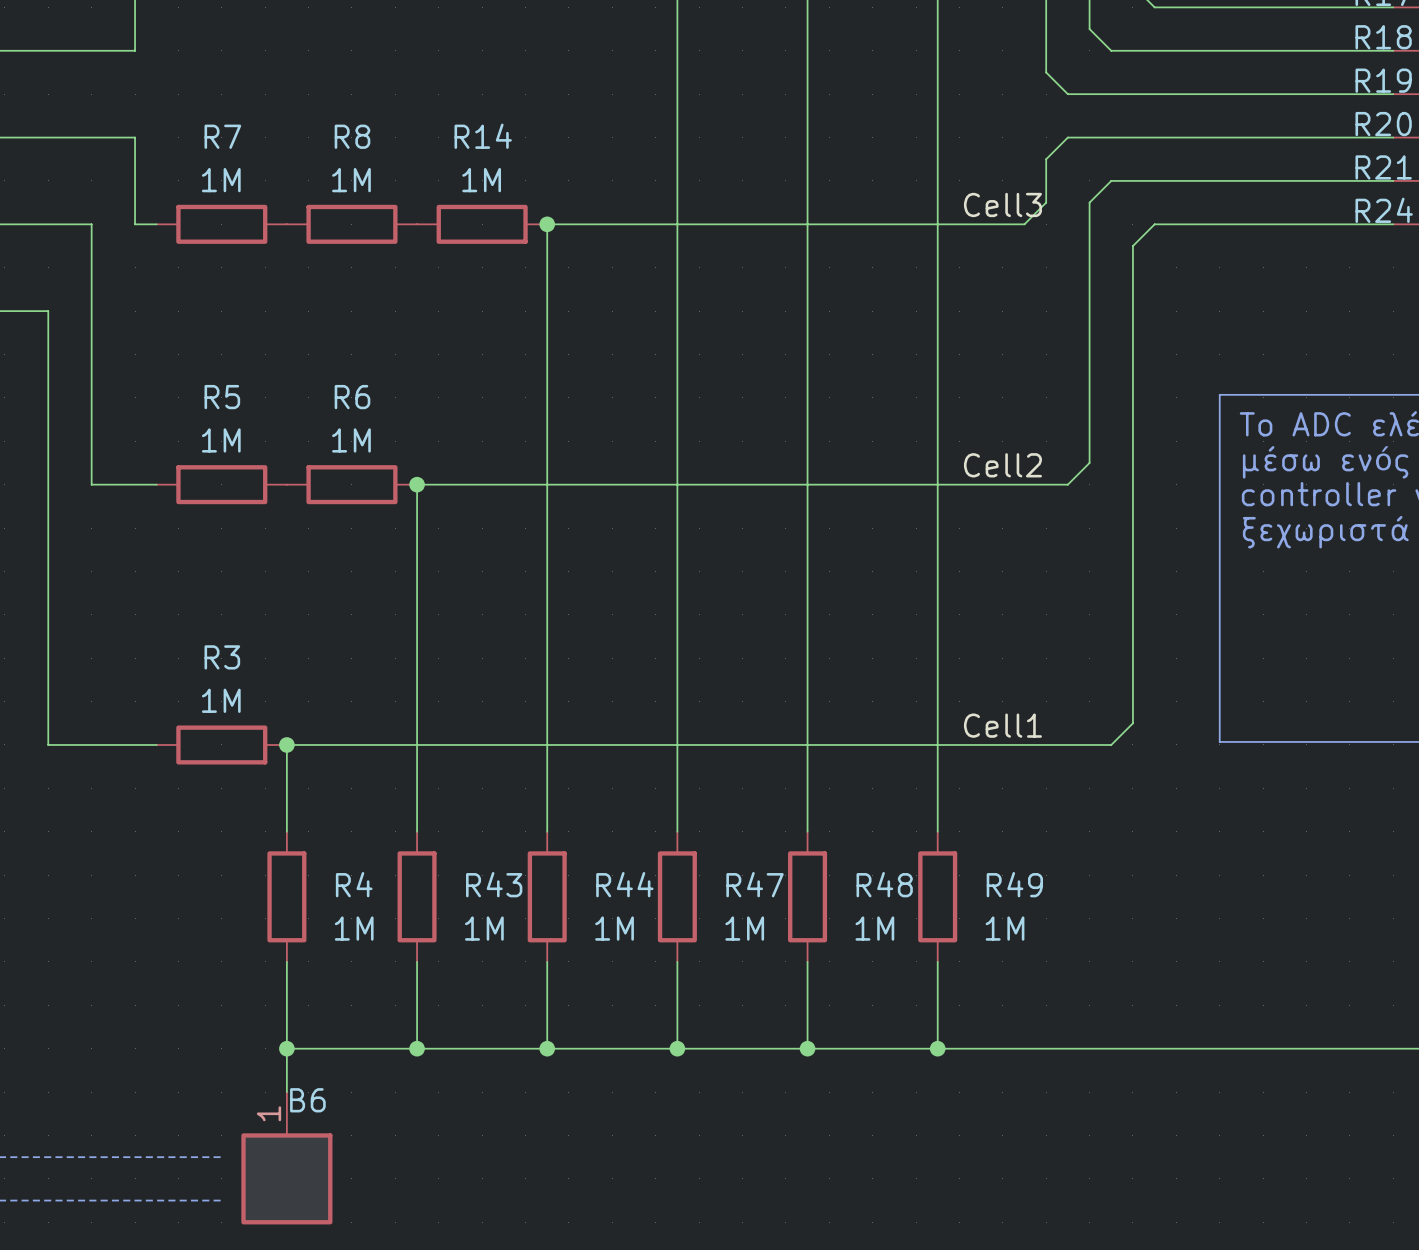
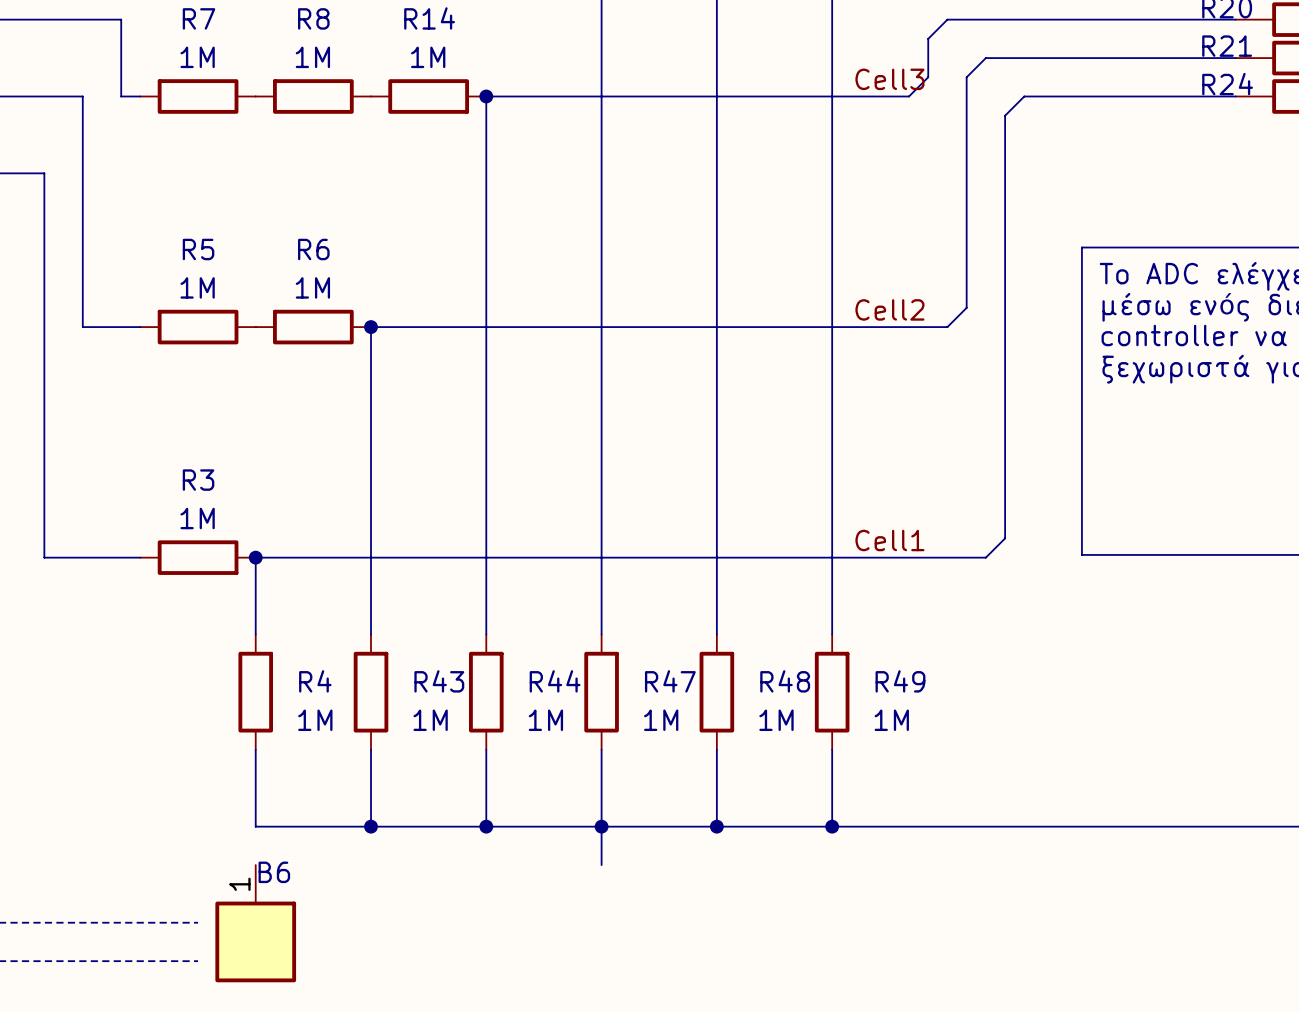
wire: (286, 1048) (286, 1092) -> (601, 826) (601, 865)
junction: (286, 1048) -> none

